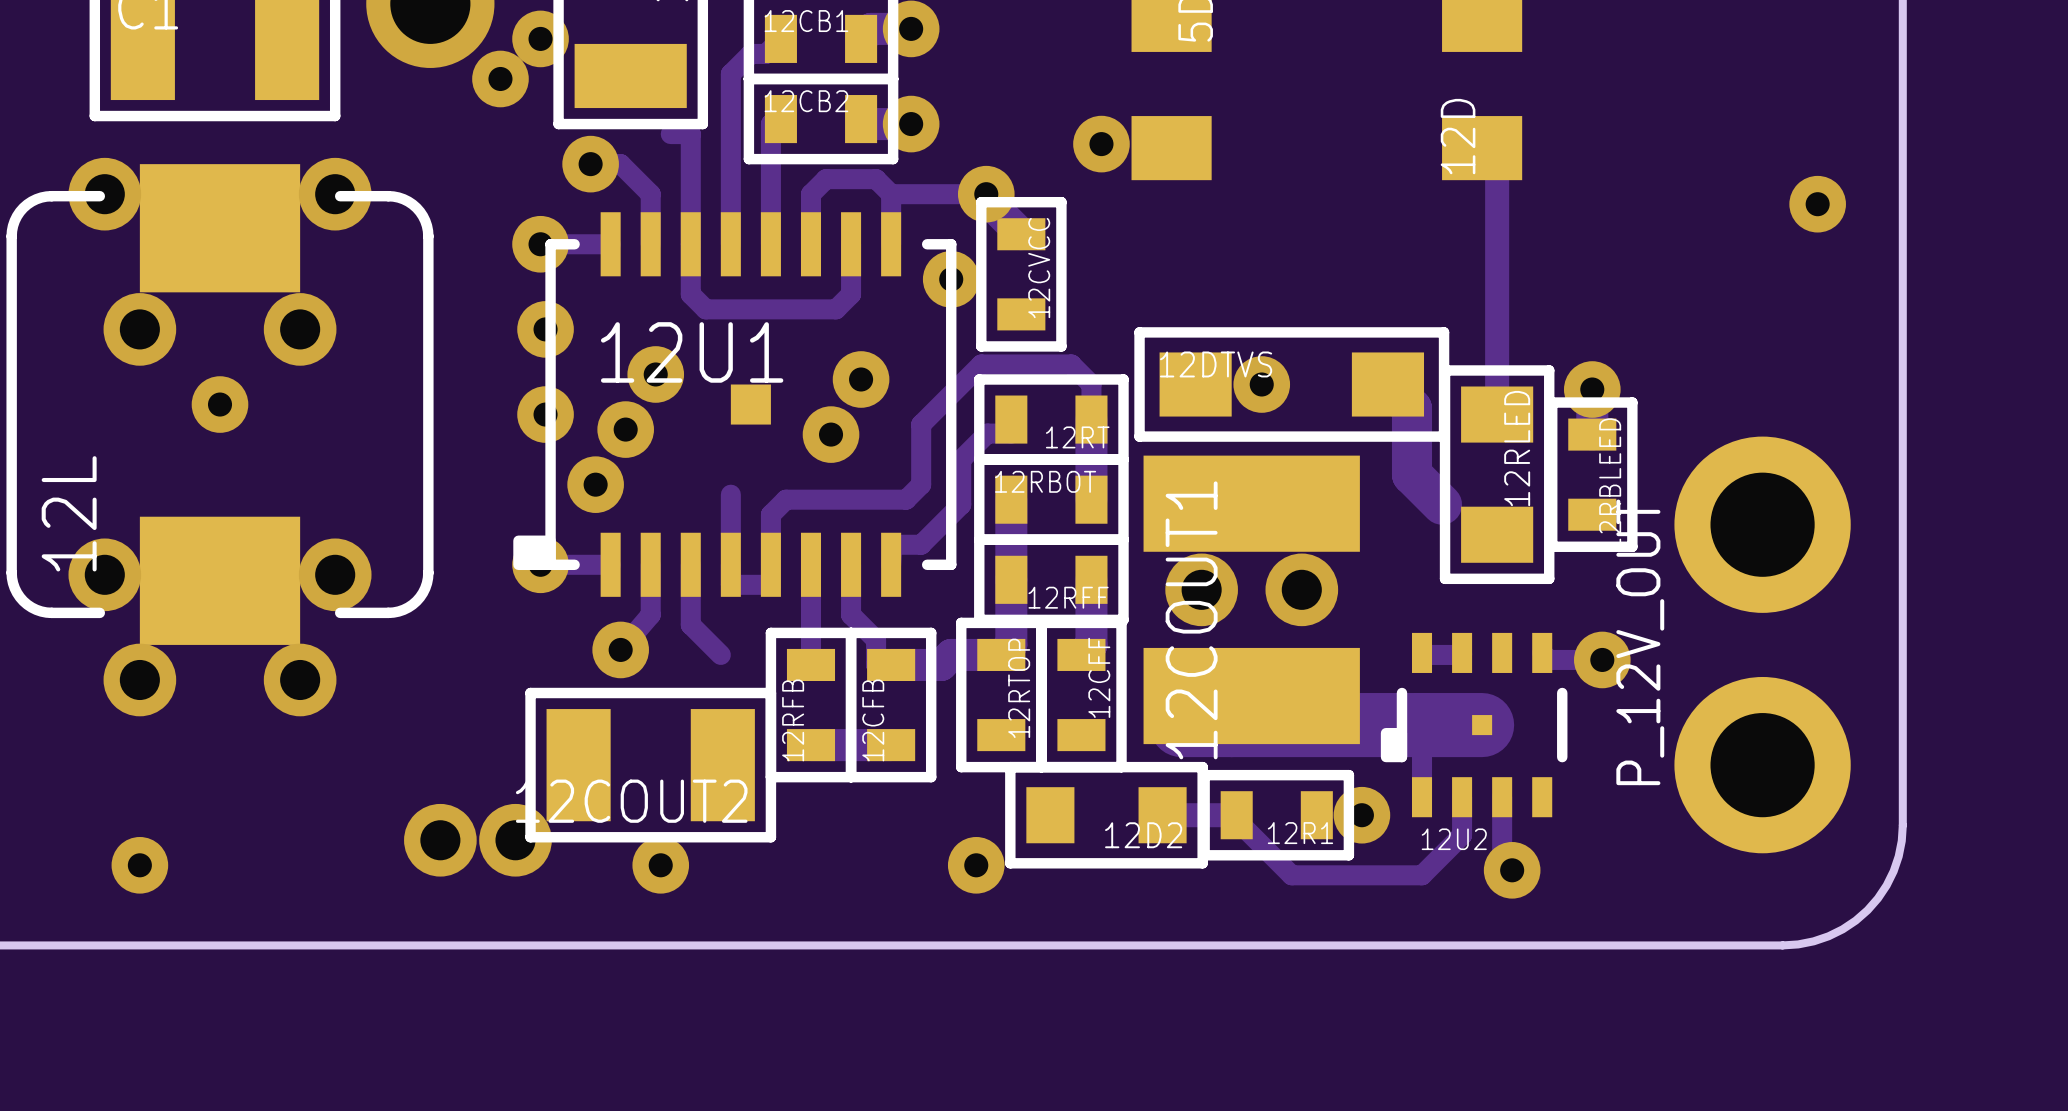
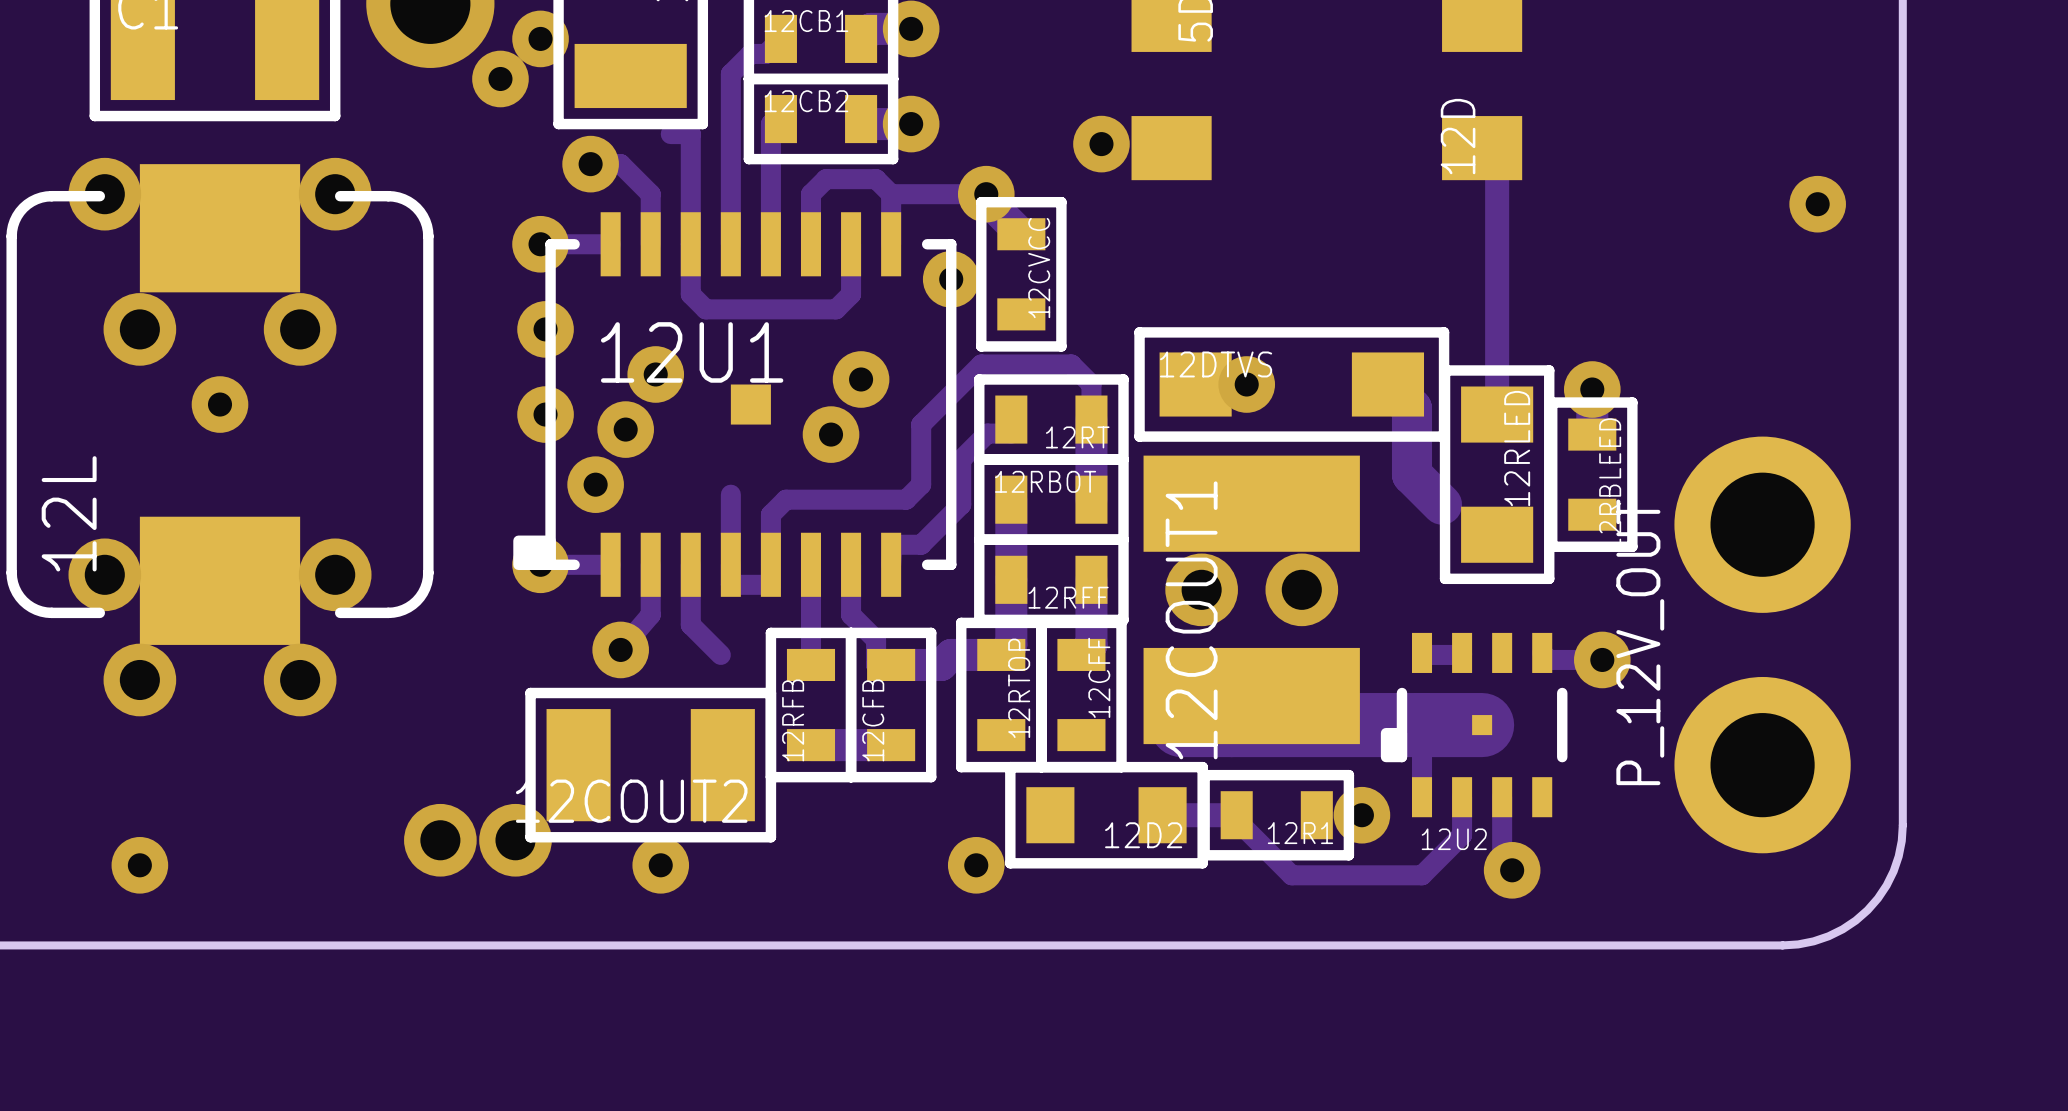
via position: (1261, 384) -> (1246, 384)

